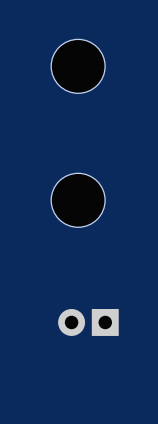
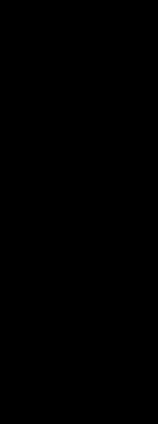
part: (78, 66) -> none
part: (78, 200) -> none
part: (88, 322) -> none

